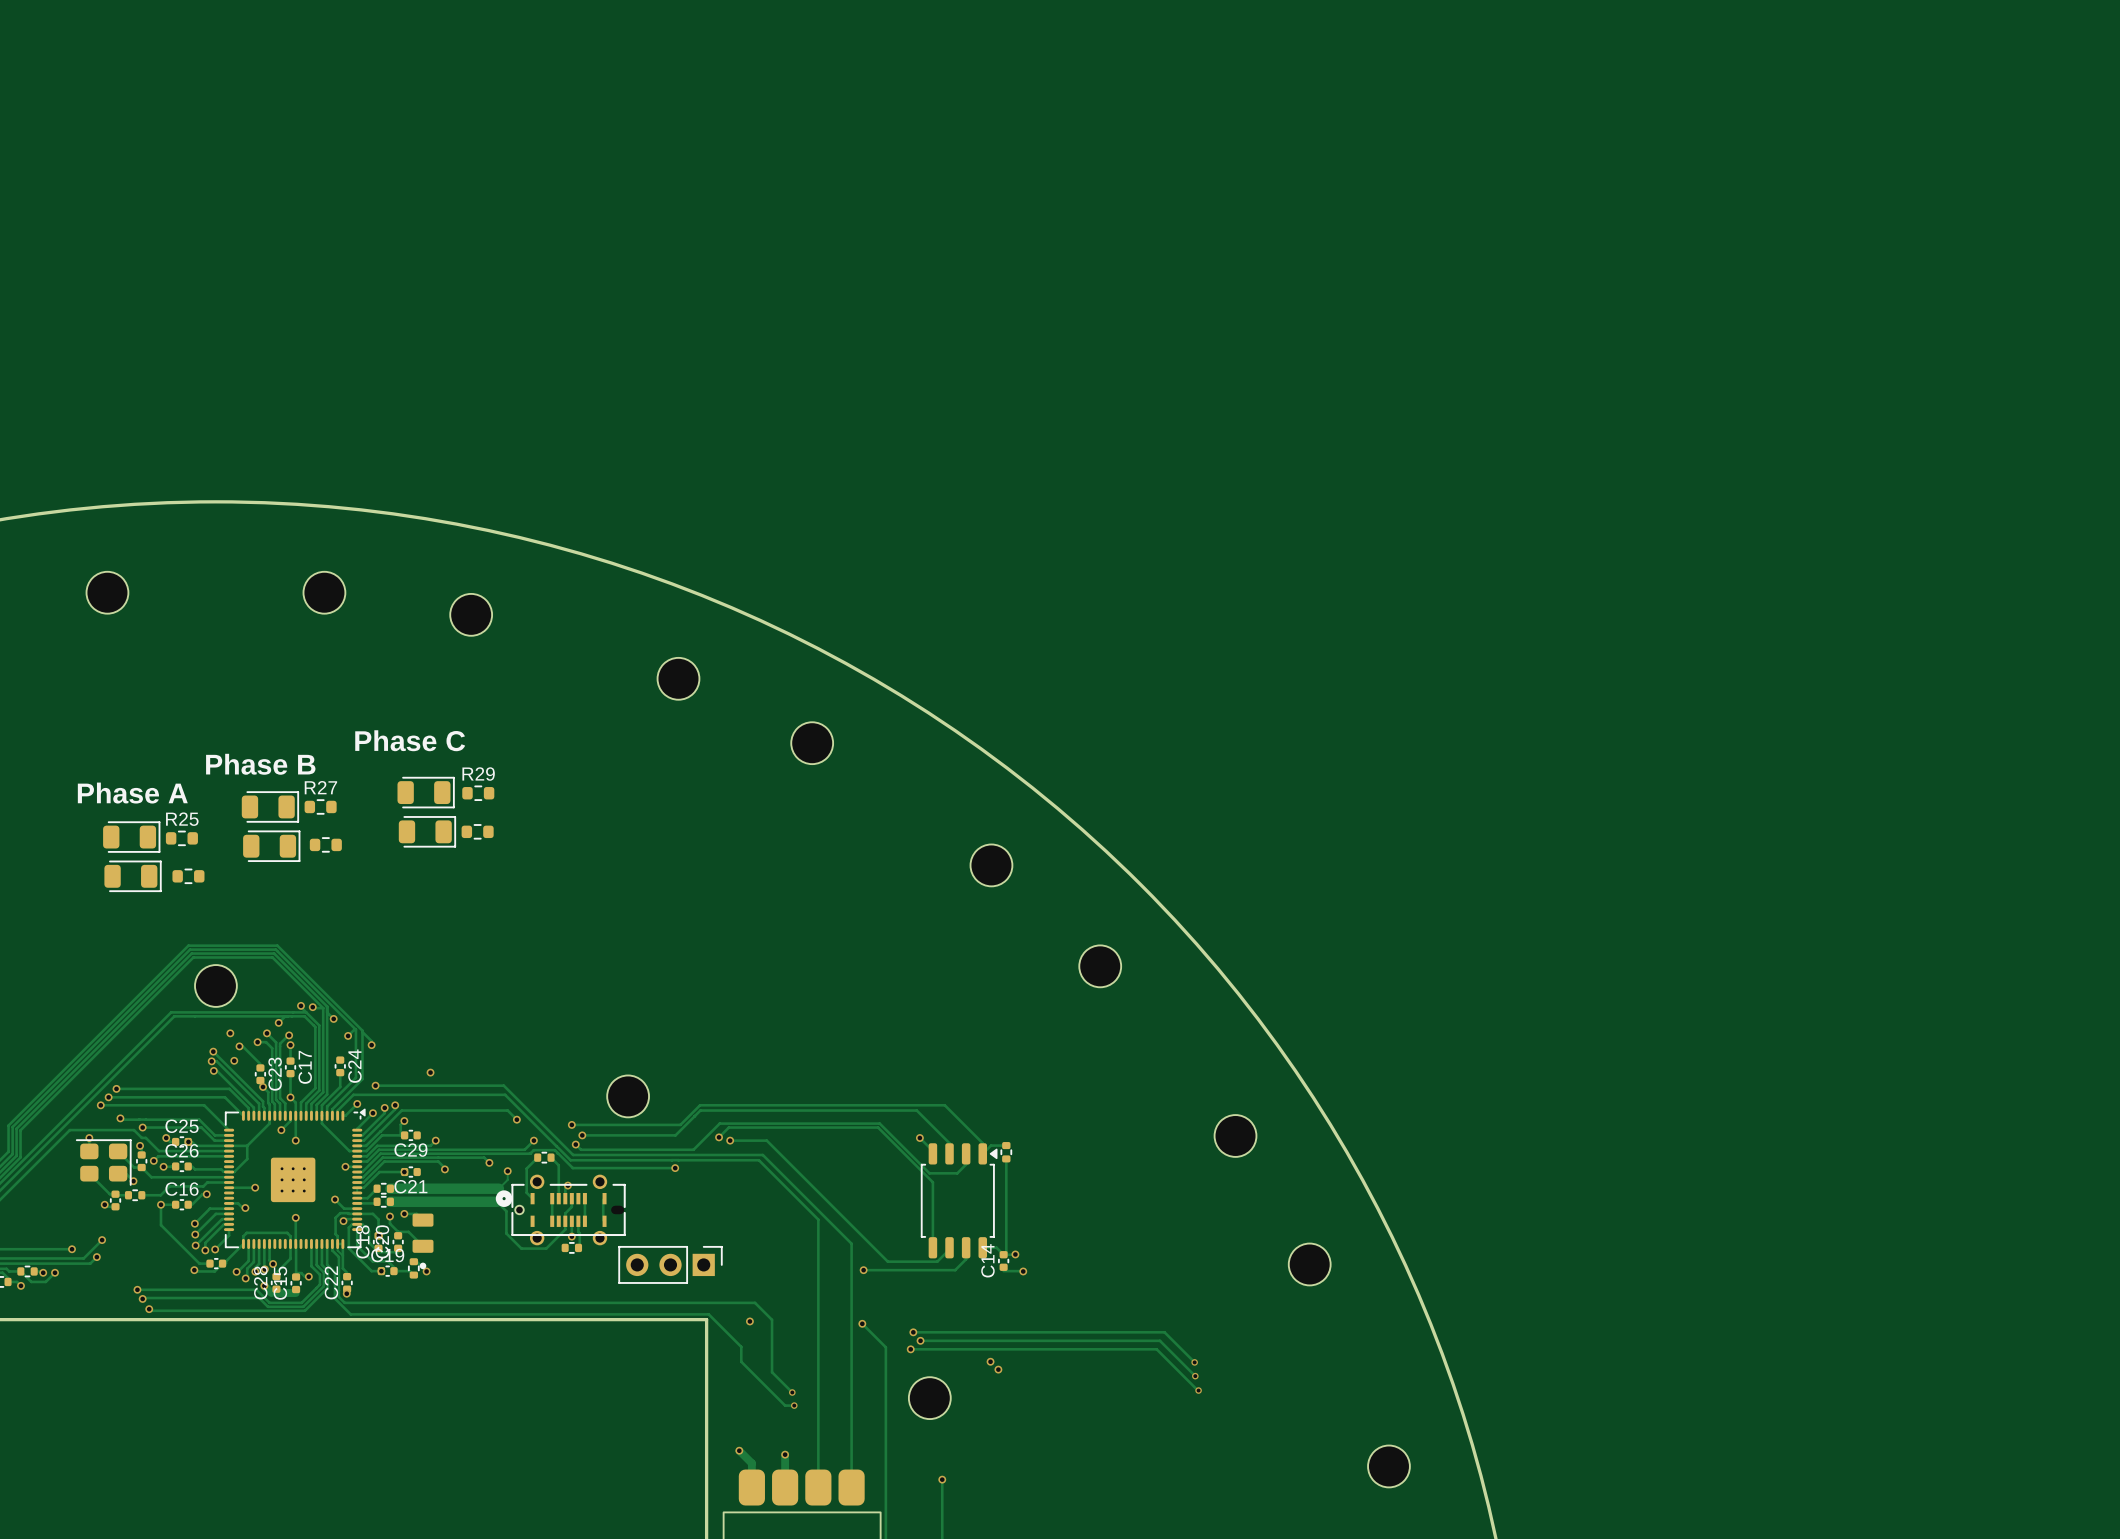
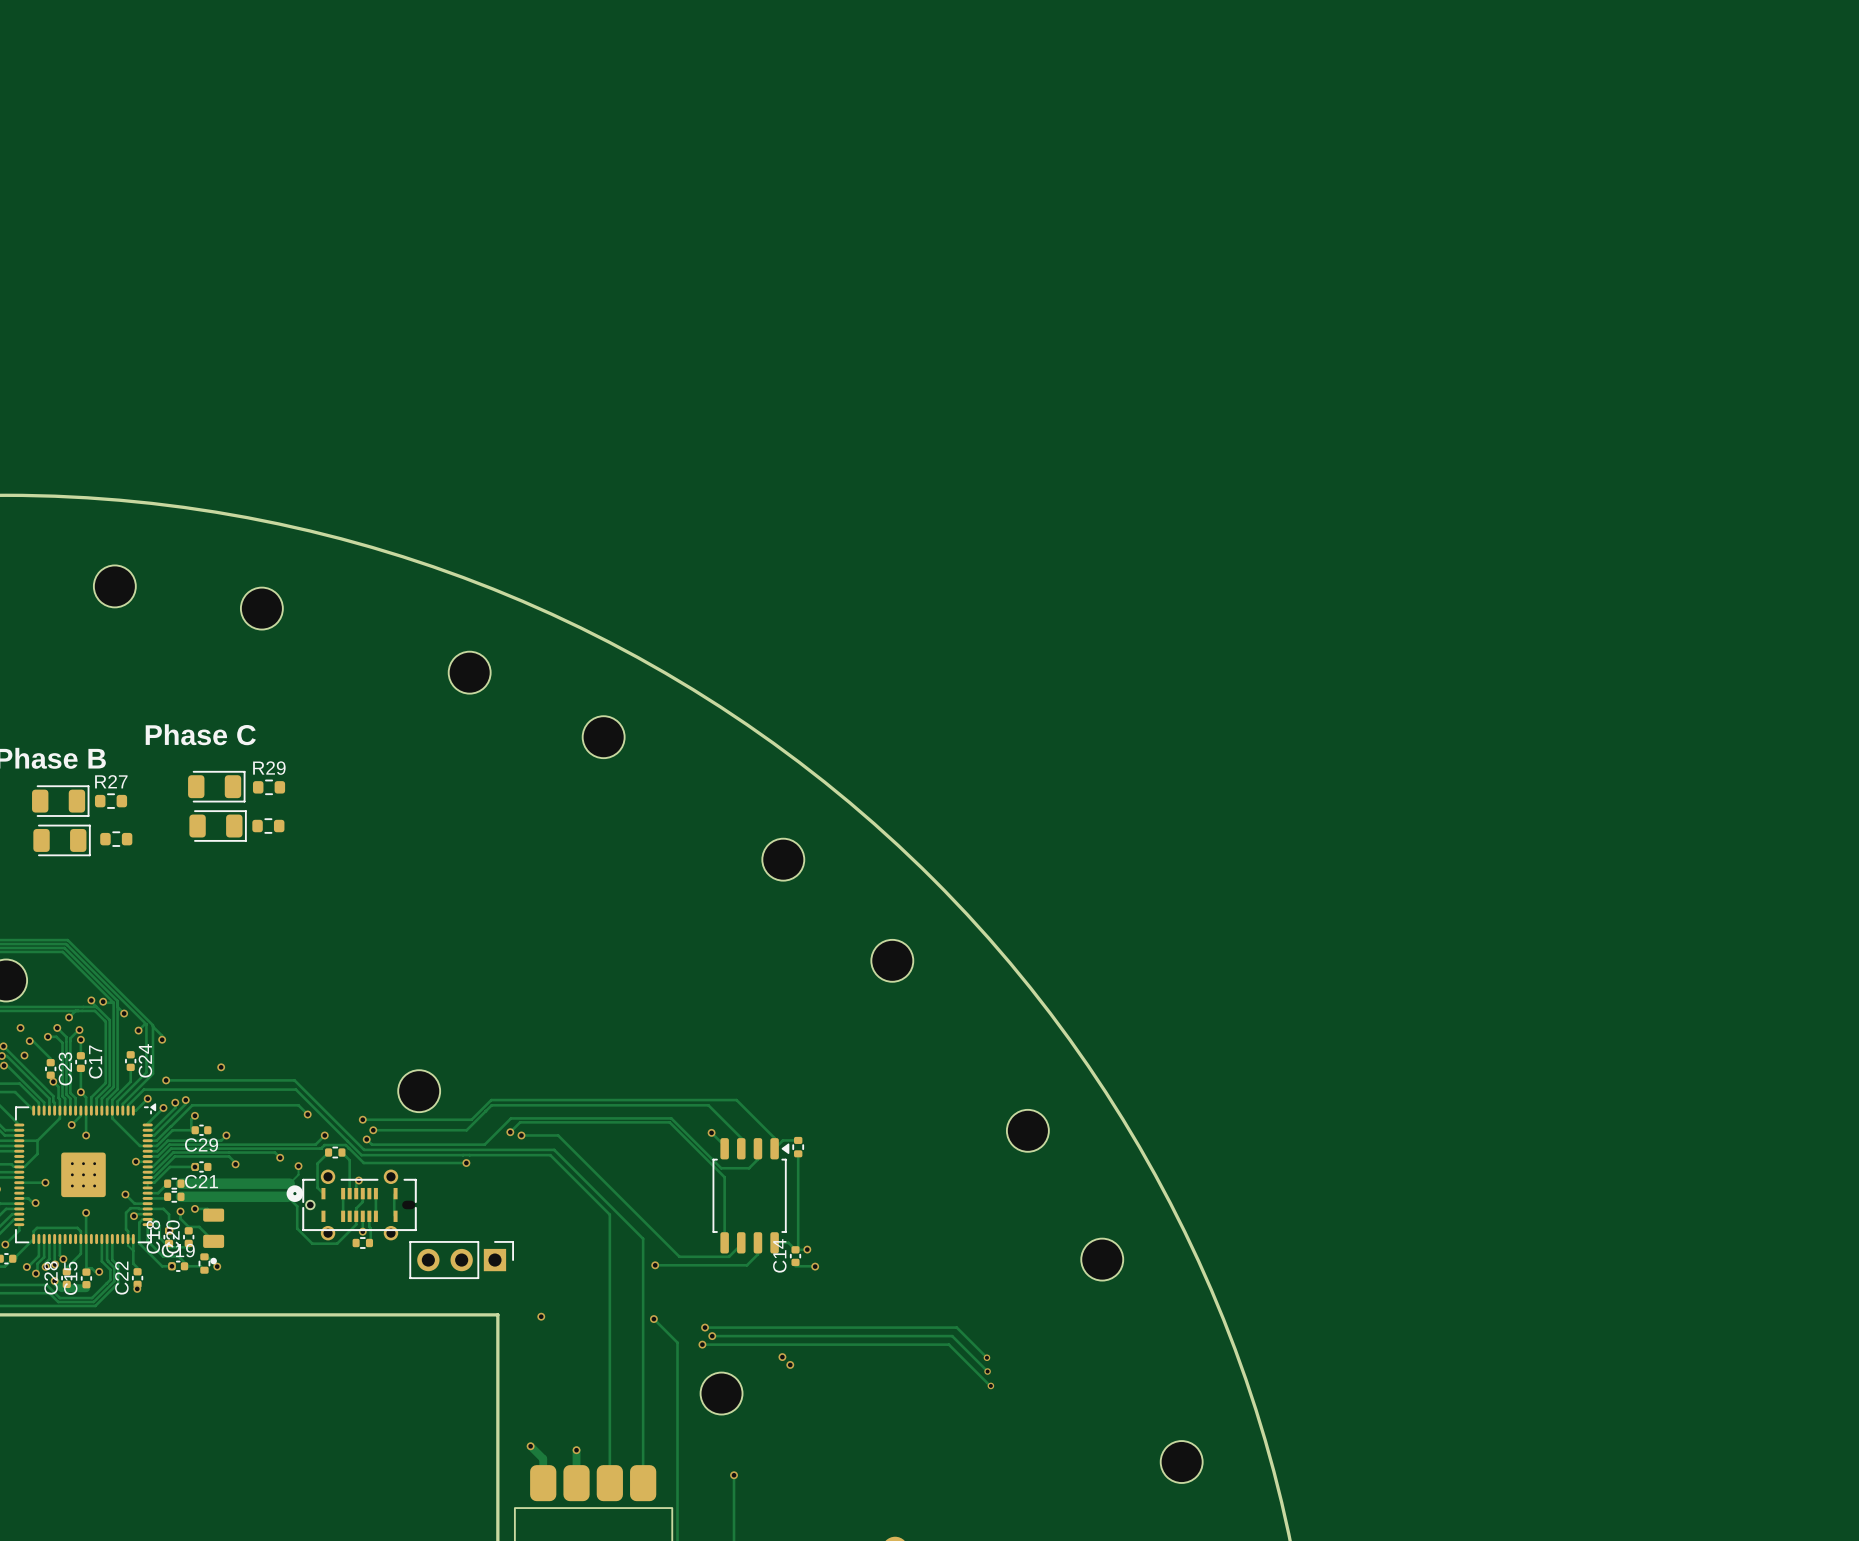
track: (327, 1243) (327, 1264) (334, 1272) (334, 1298) (350, 1314) (708, 1314) (741, 1346) (741, 1361) (785, 1405) (794, 1405) -> none
track: (332, 1243) (332, 1250) (338, 1257) (338, 1296) (344, 1302) (755, 1302) (772, 1319) (772, 1372) (792, 1392) -> none
via: (792, 1392) -> none
via: (794, 1405) -> none

